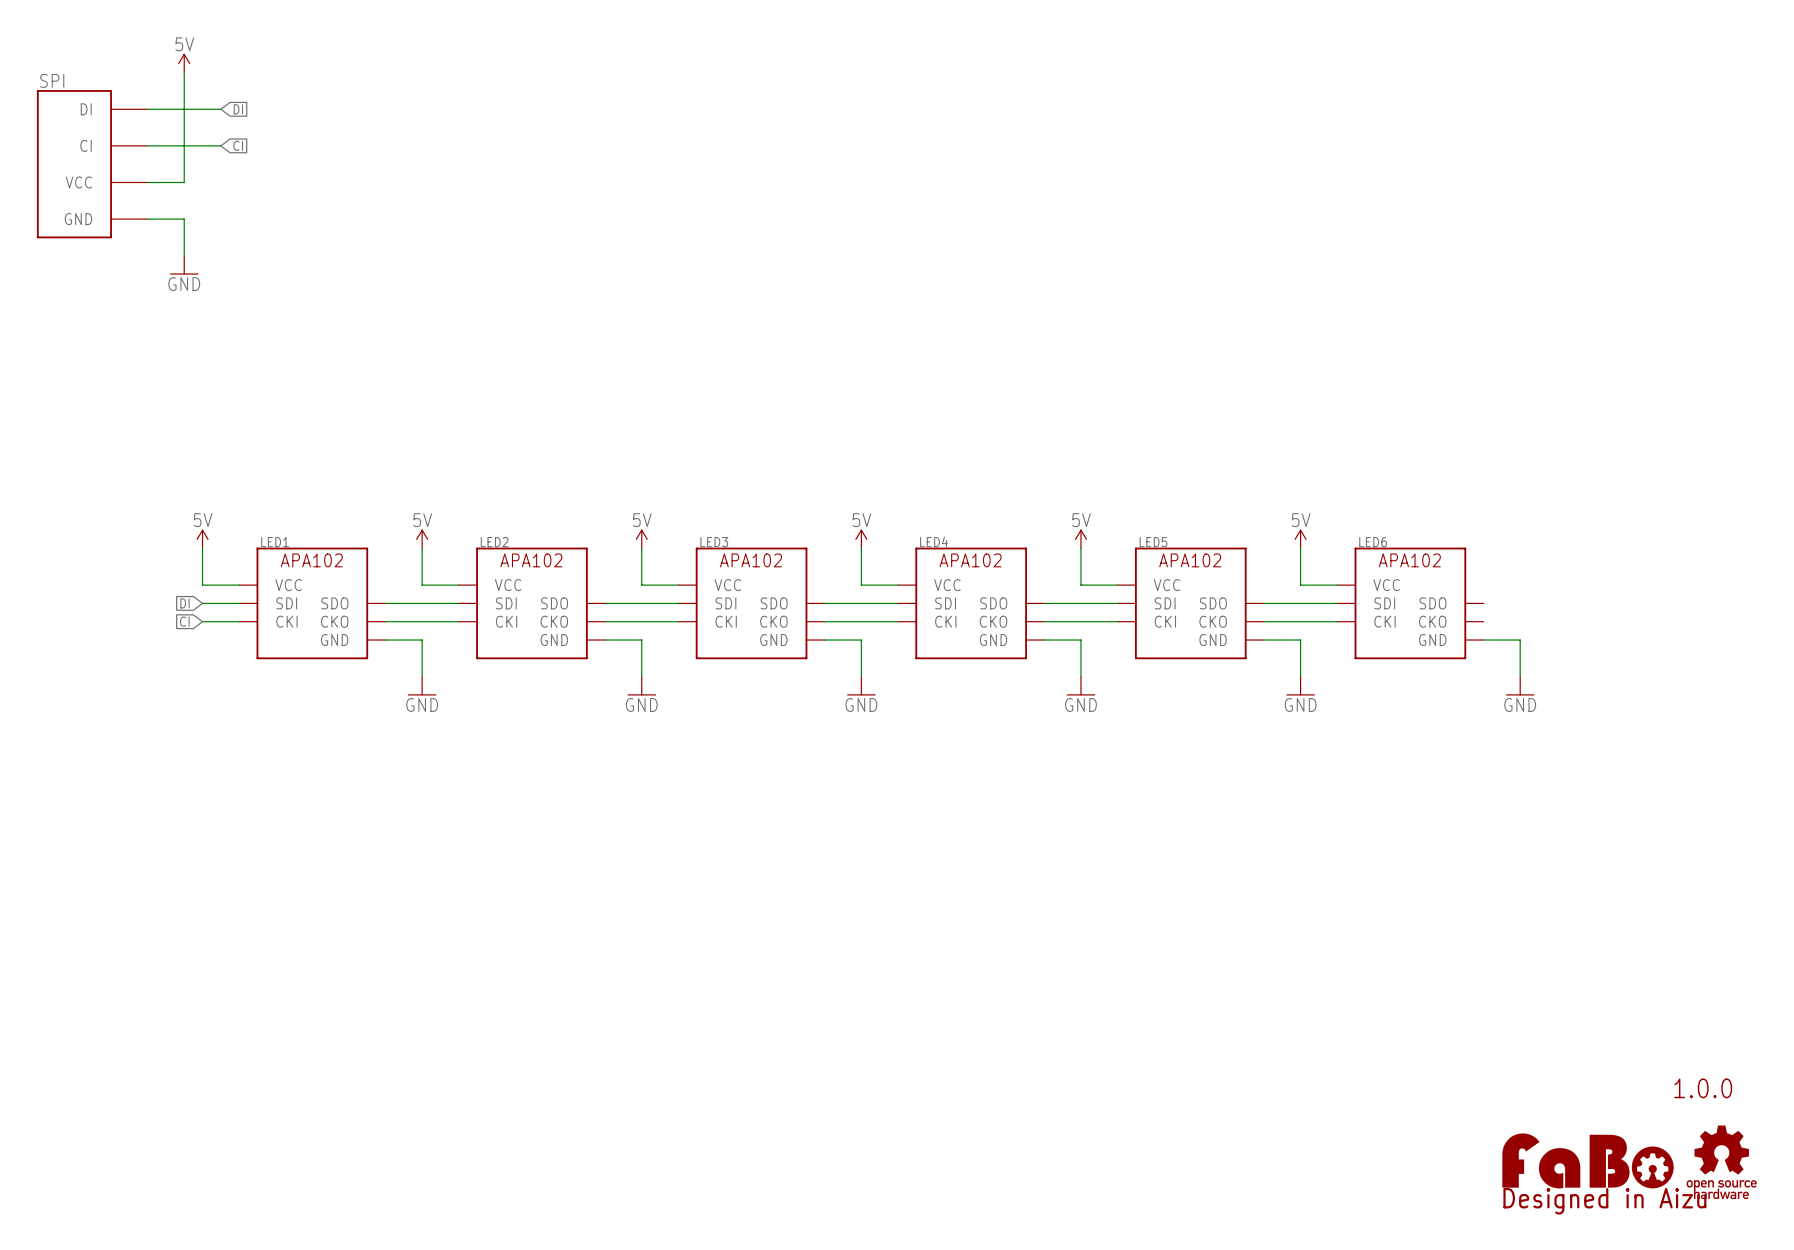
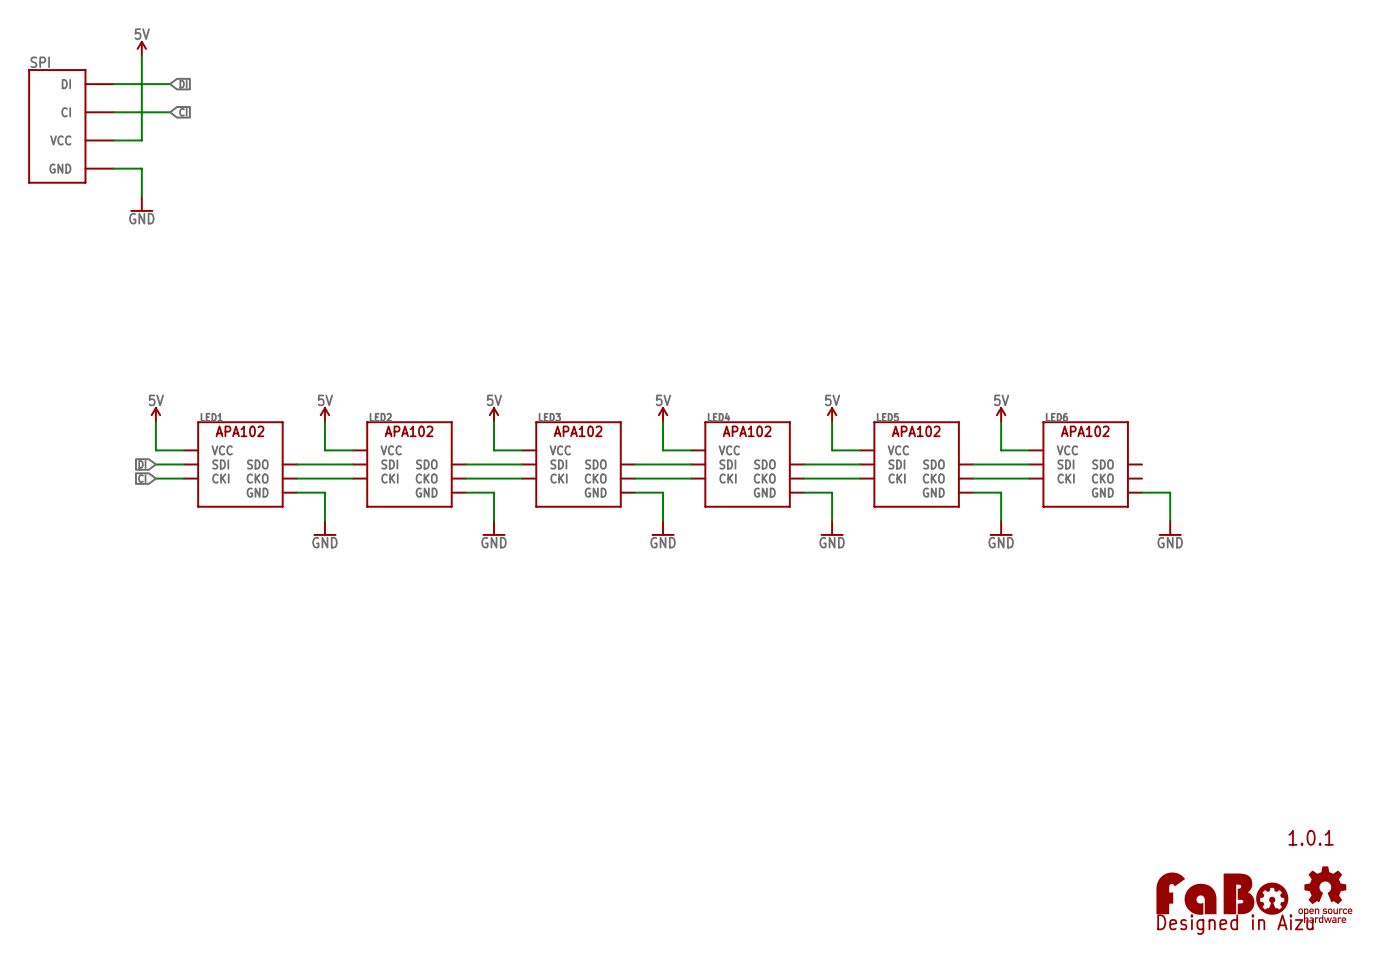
text: 1.0.0 (1703, 1088) -> 1.0.1 (1311, 837)

